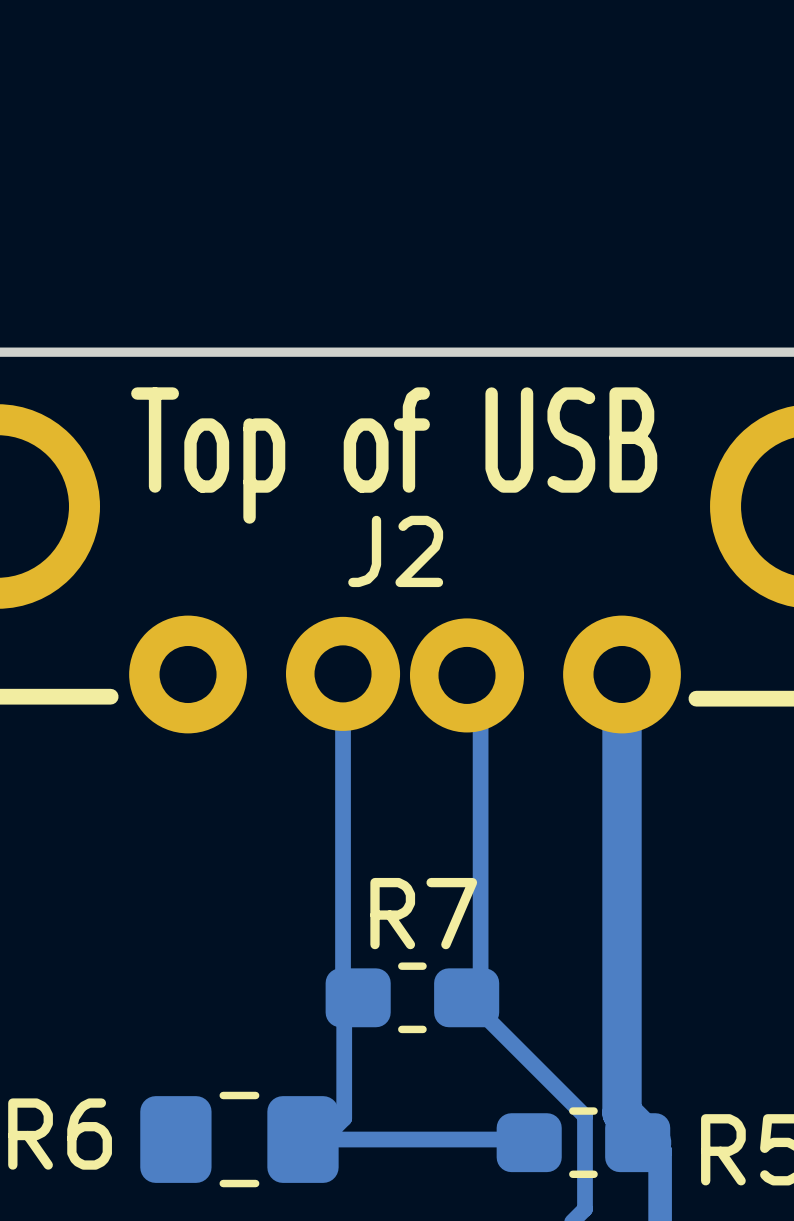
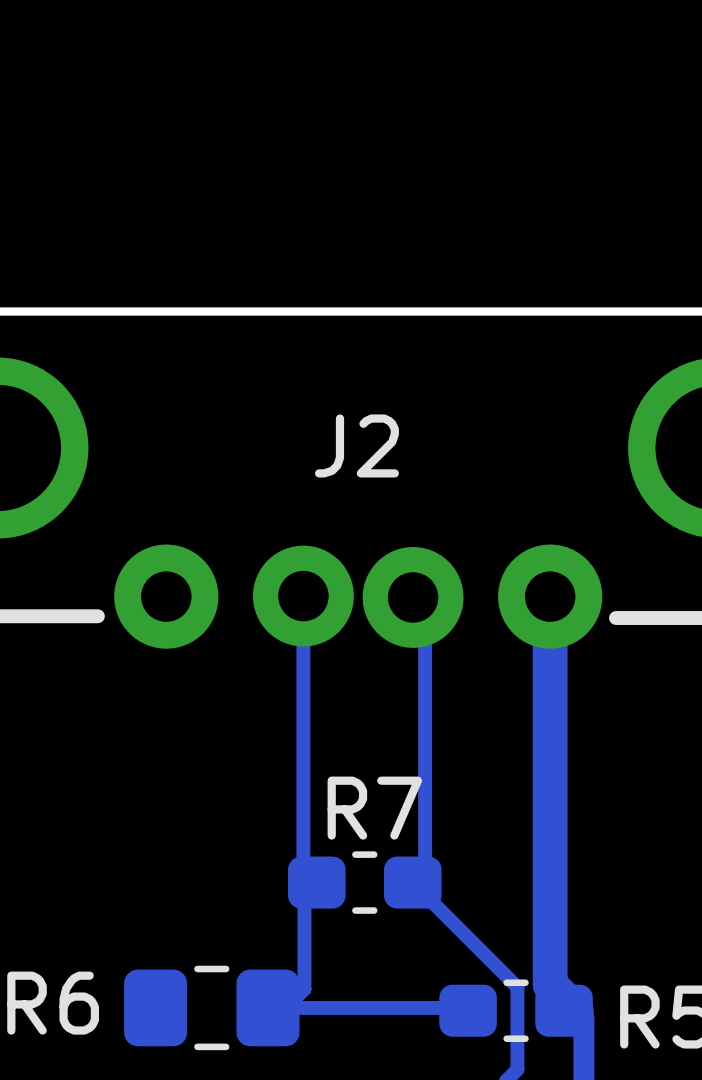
text: Top of USB (394, 455) -> none
J2 name position: J2 (395, 551) -> J2 (356, 445)

